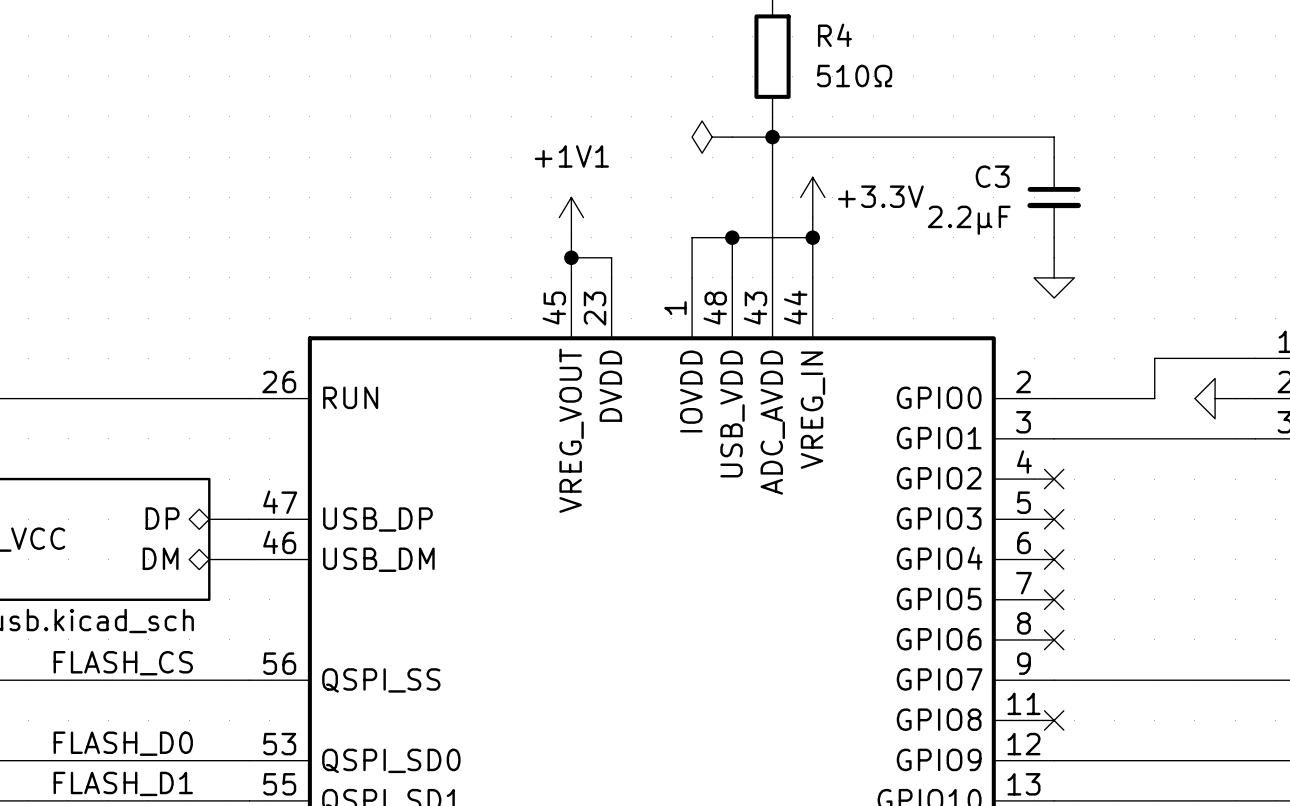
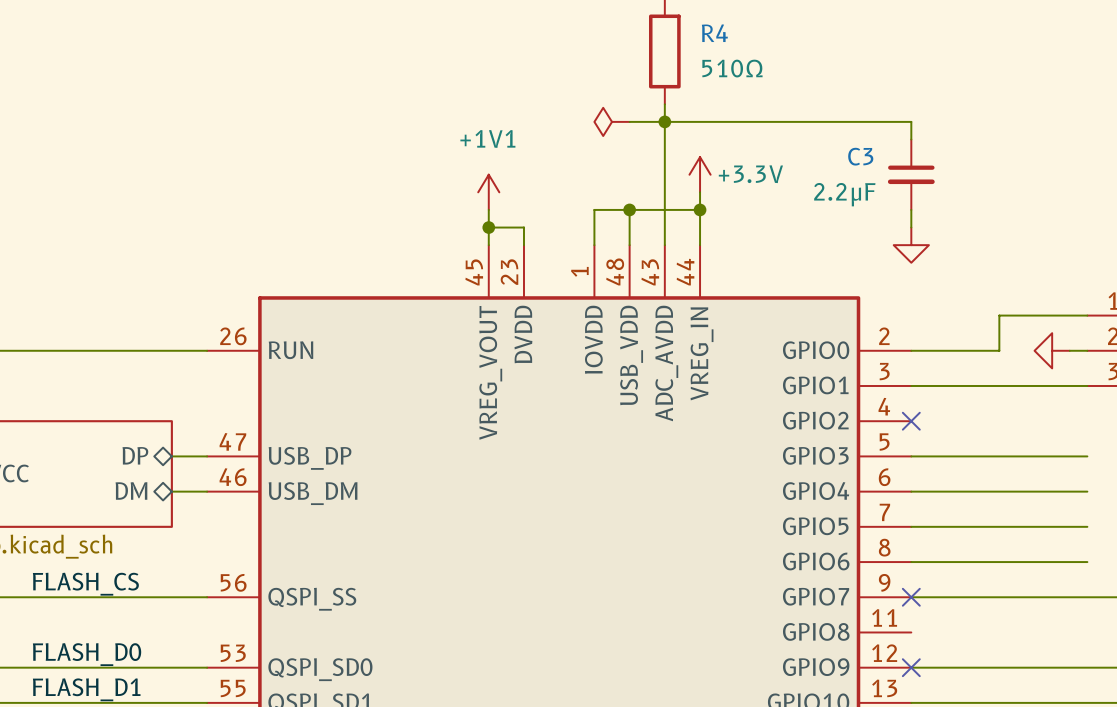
wire: none -> (911, 456) (1087, 456)
no-connect mark: (1054, 519) -> none
wire: none -> (911, 491) (1087, 491)
no-connect mark: (1054, 559) -> none
wire: none -> (911, 526) (1087, 526)
no-connect mark: (1054, 599) -> none
wire: none -> (911, 562) (1087, 562)
no-connect mark: (1054, 639) -> none
no-connect mark: none -> (911, 597)
no-connect mark: (1054, 720) -> none
no-connect mark: none -> (911, 667)

